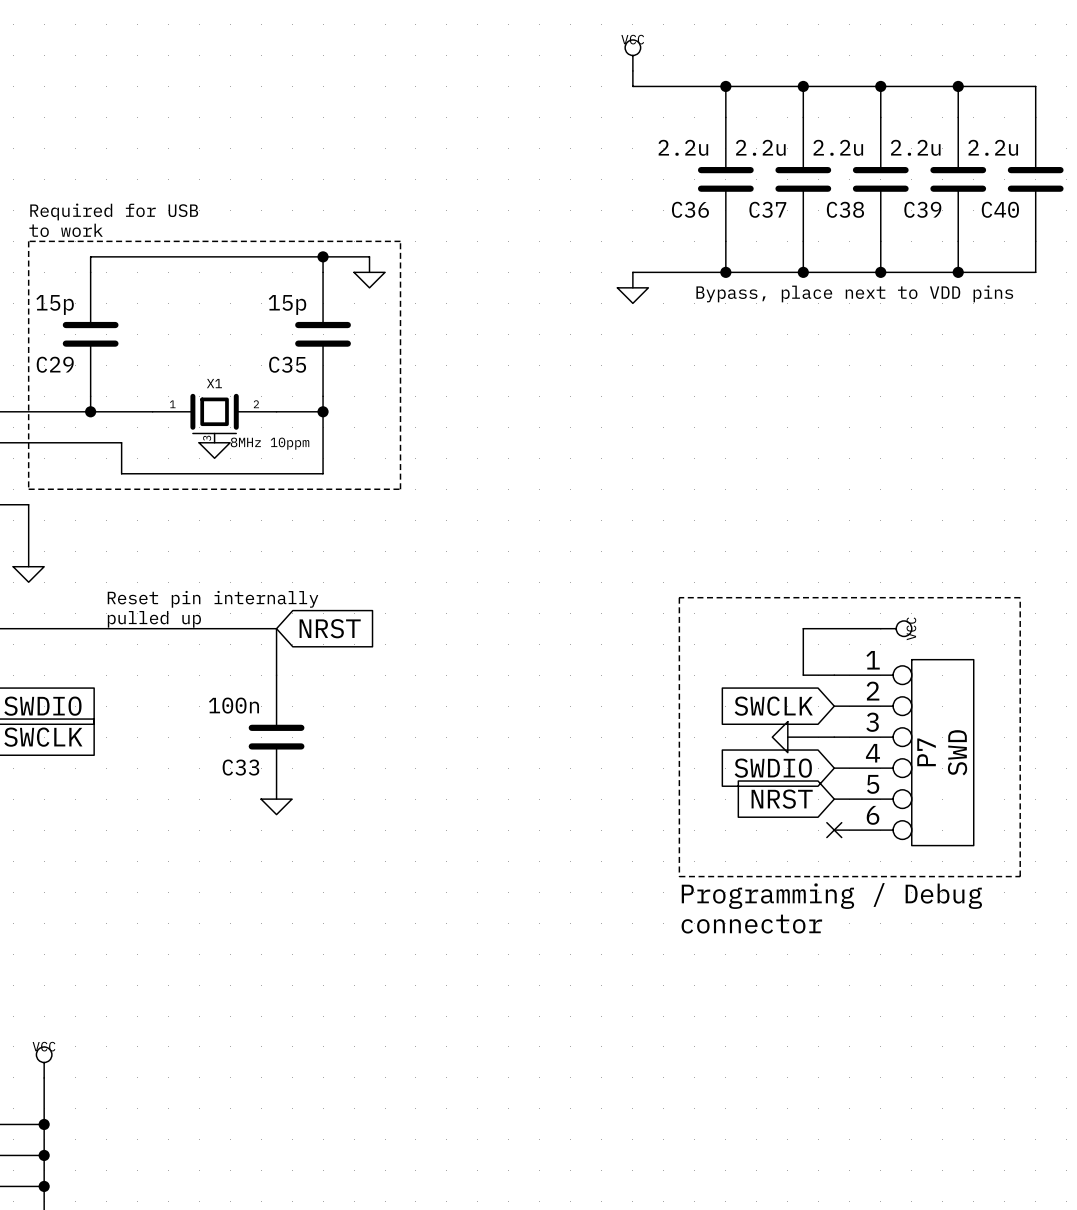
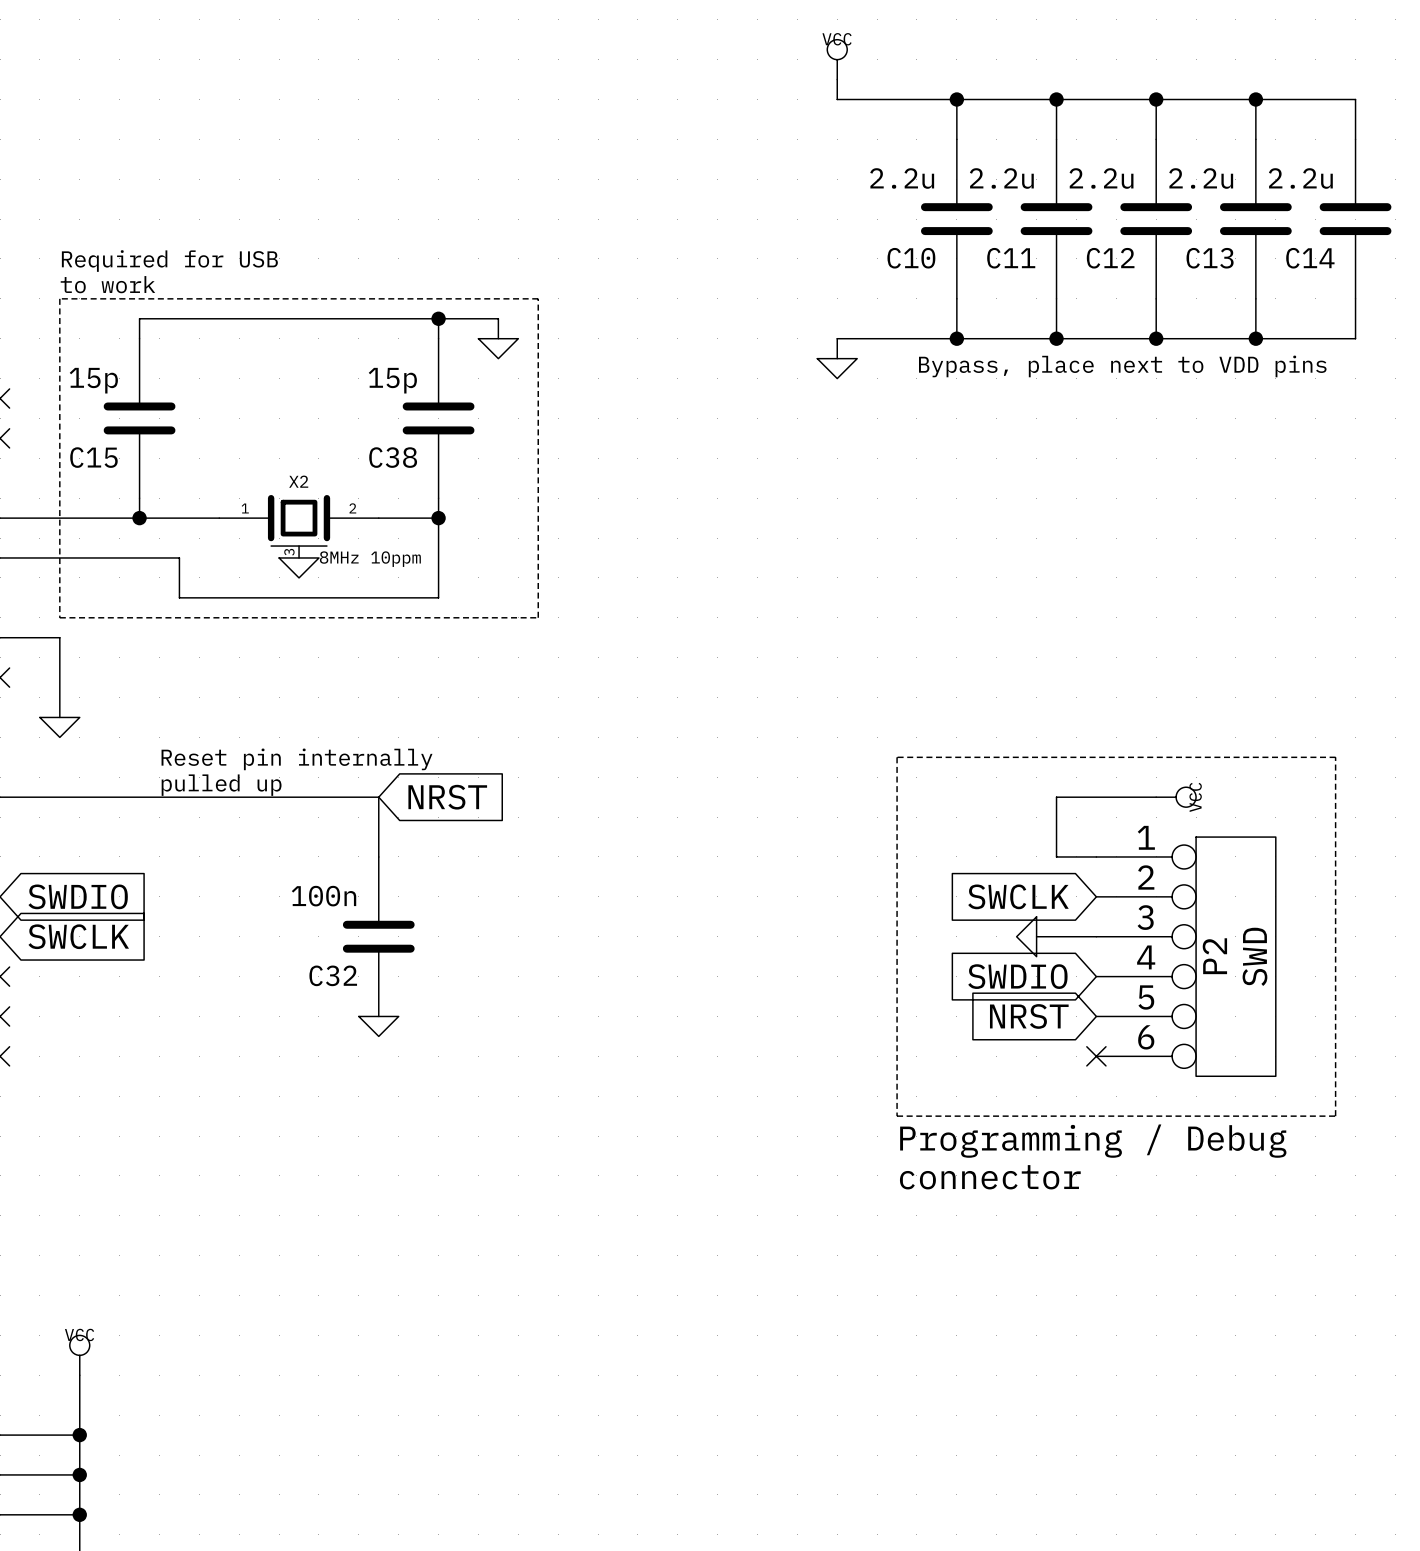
C36 name: C36 (690, 209) -> C10 (911, 258)
C37 name: C37 (767, 209) -> C11 (1011, 258)
C38 name: C38 (845, 209) -> C12 (1110, 258)
C39 name: C39 (922, 209) -> C13 (1210, 258)
C40 name: C40 (1000, 209) -> C14 (1310, 258)
C29 name: C29 (55, 364) -> C15 (93, 457)
C35 name: C35 (287, 364) -> C38 (393, 457)
X1 name: X1 (214, 383) -> X2 (298, 481)
P7 name: P7 (926, 752) -> P2 (1214, 956)
C33 name: C33 (240, 767) -> C32 (333, 975)

